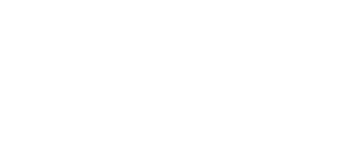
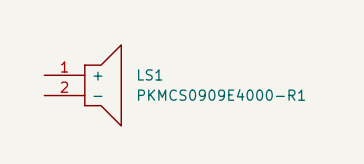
LS1: none -> PKMCS0909E4000-R1 (83, 85)

